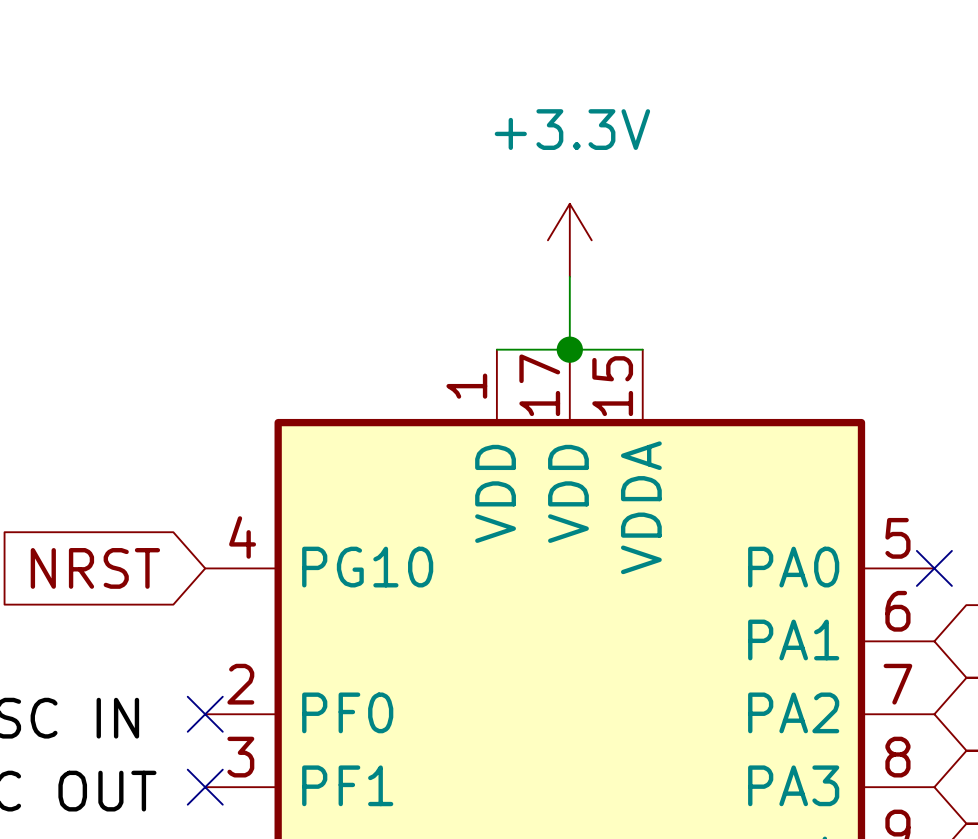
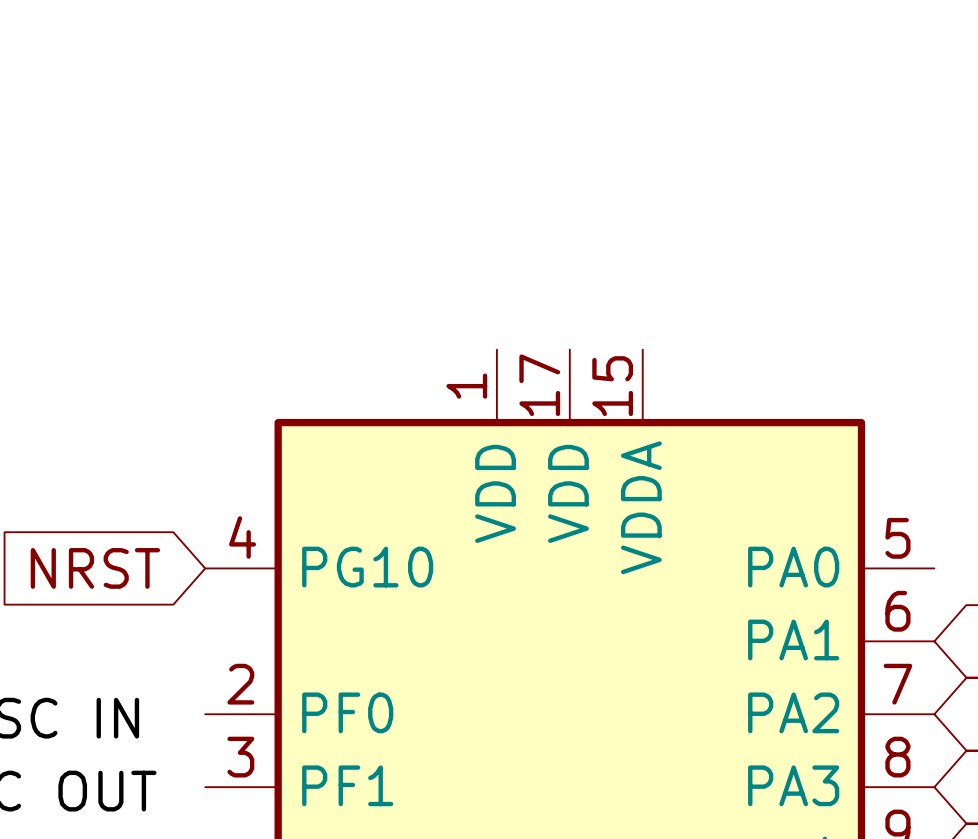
power symbol: +3.3V (569, 240) -> none
wire: (569, 276) (569, 349) -> none
wire: (496, 349) (642, 349) -> none
junction: (569, 349) -> none
no-connect mark: (934, 568) -> none
no-connect mark: (205, 714) -> none
no-connect mark: (205, 787) -> none

